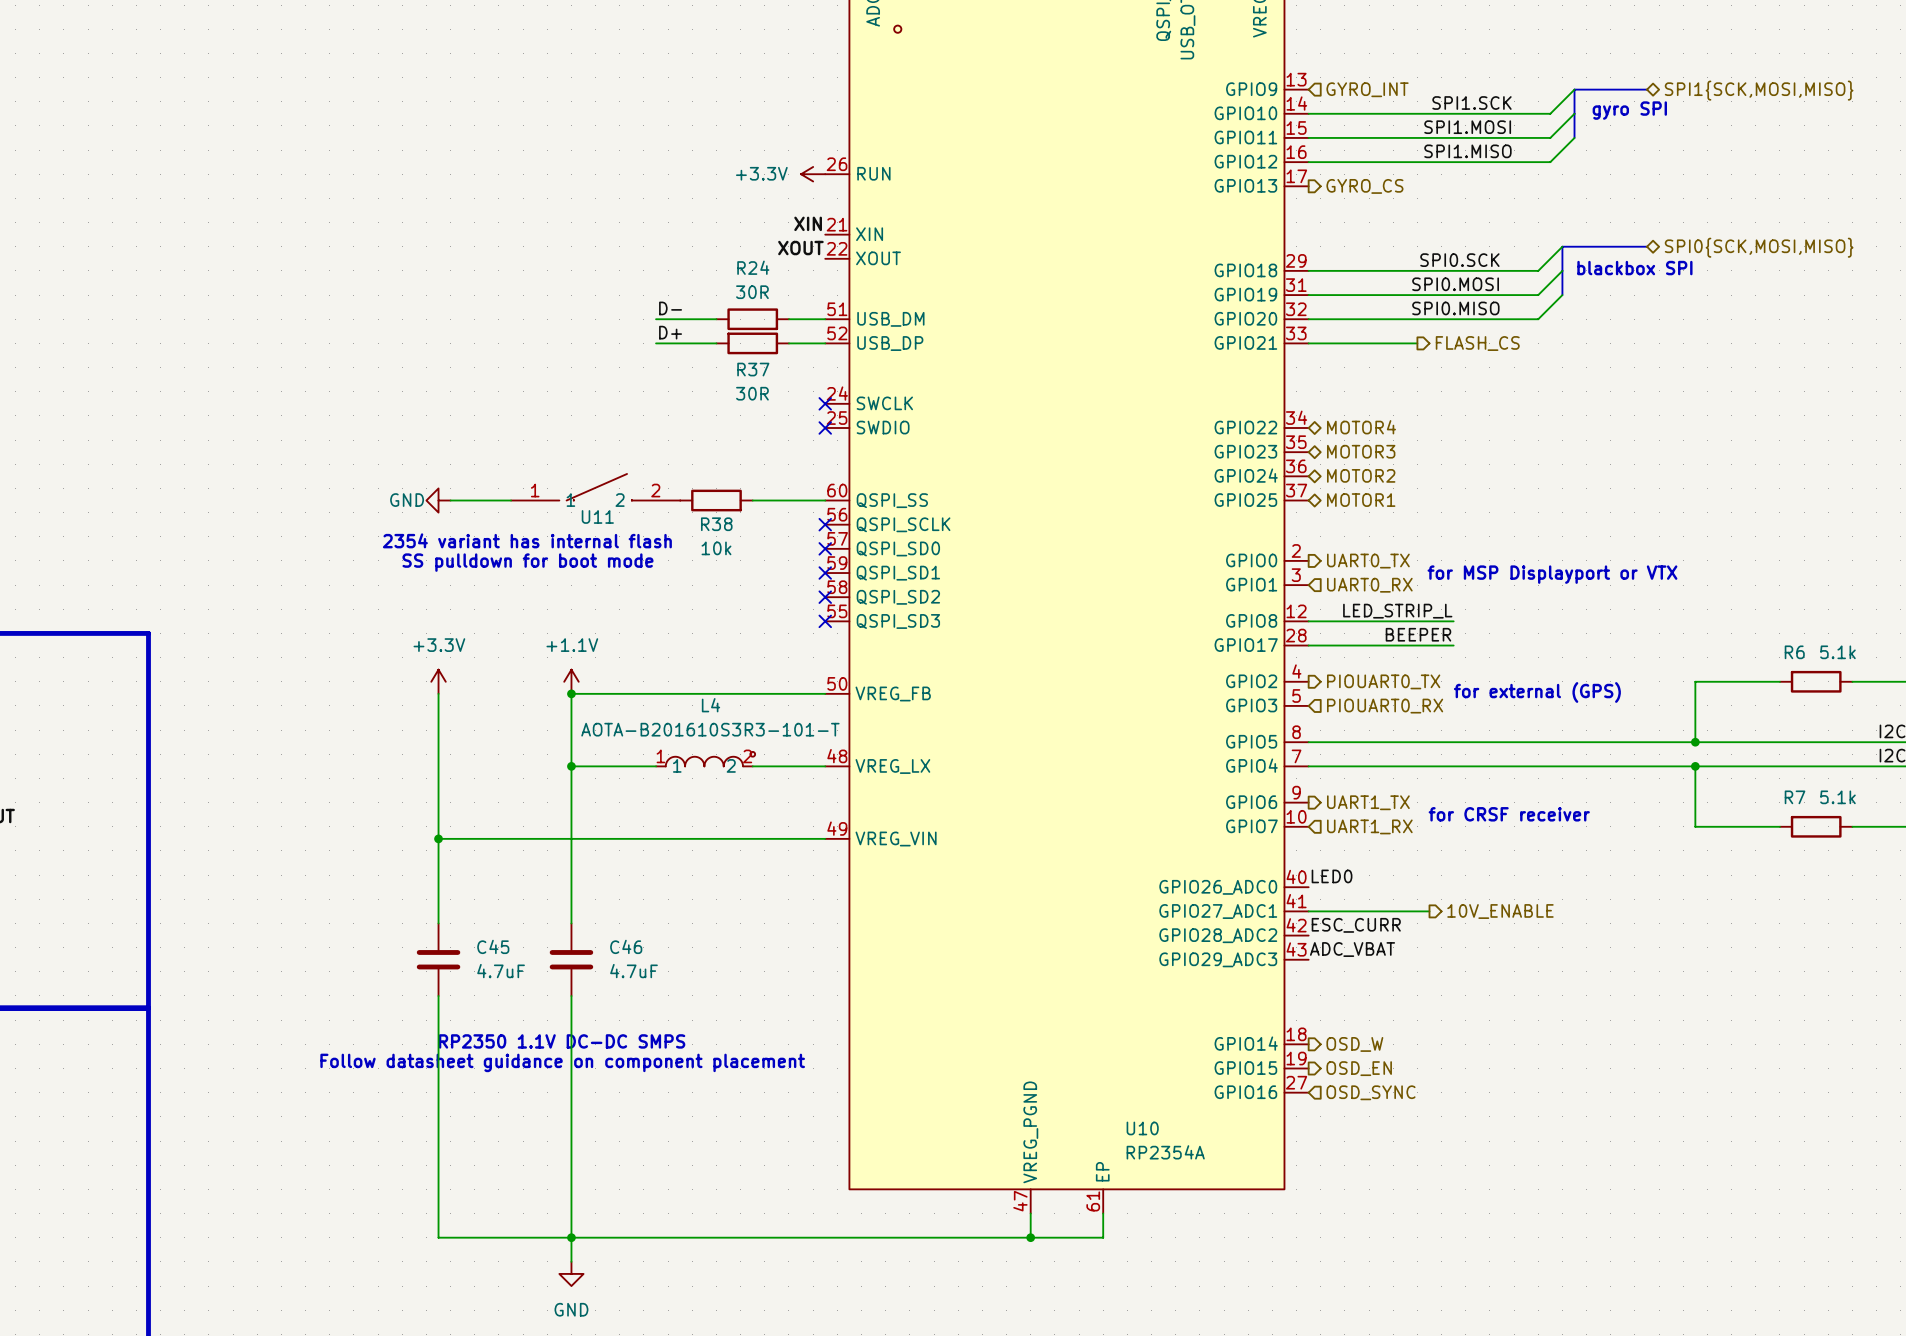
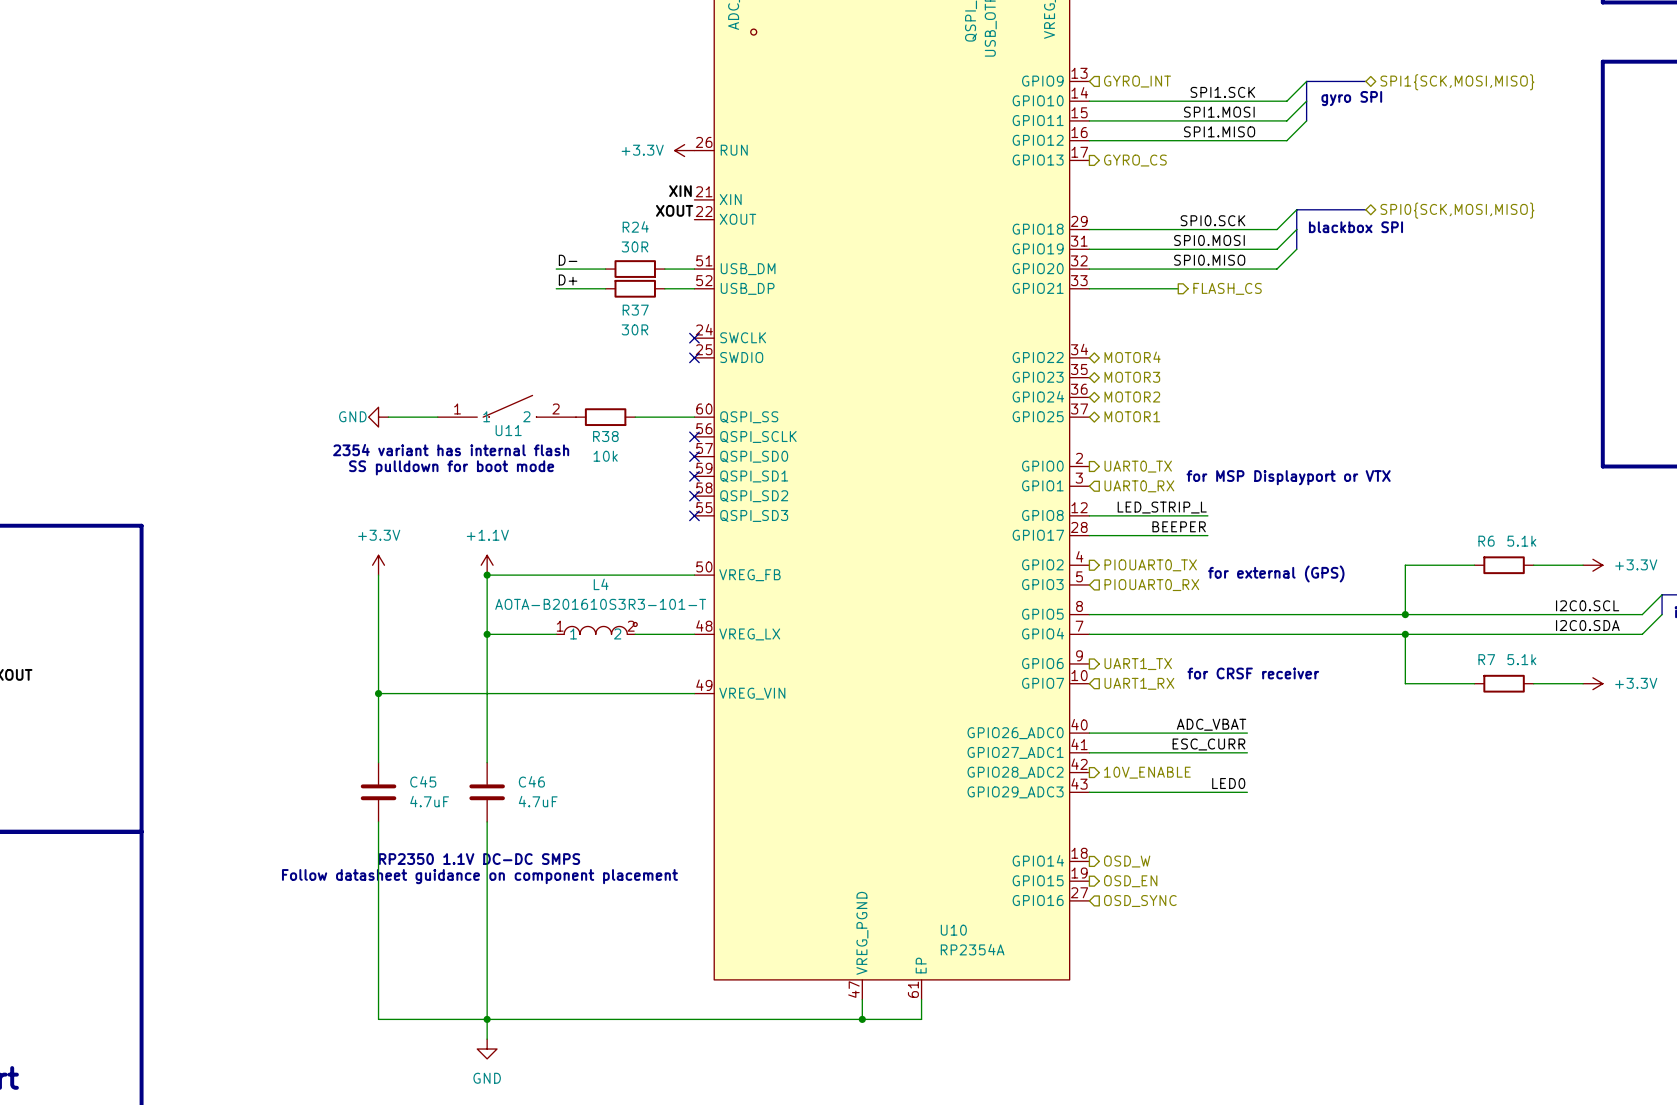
label position: LED0 (1332, 876) -> LED0 (1228, 783)
wire: none -> (1089, 733) (1247, 733)
wire: none -> (1188, 752) (1247, 752)
hierarchical label position: 10V_ENABLE (1500, 911) -> 10V_ENABLE (1147, 772)
label position: ESC_CURR (1356, 925) -> ESC_CURR (1208, 744)
label position: ADC_VBAT (1352, 949) -> ADC_VBAT (1211, 724)
wire: none -> (1089, 792) (1247, 792)

